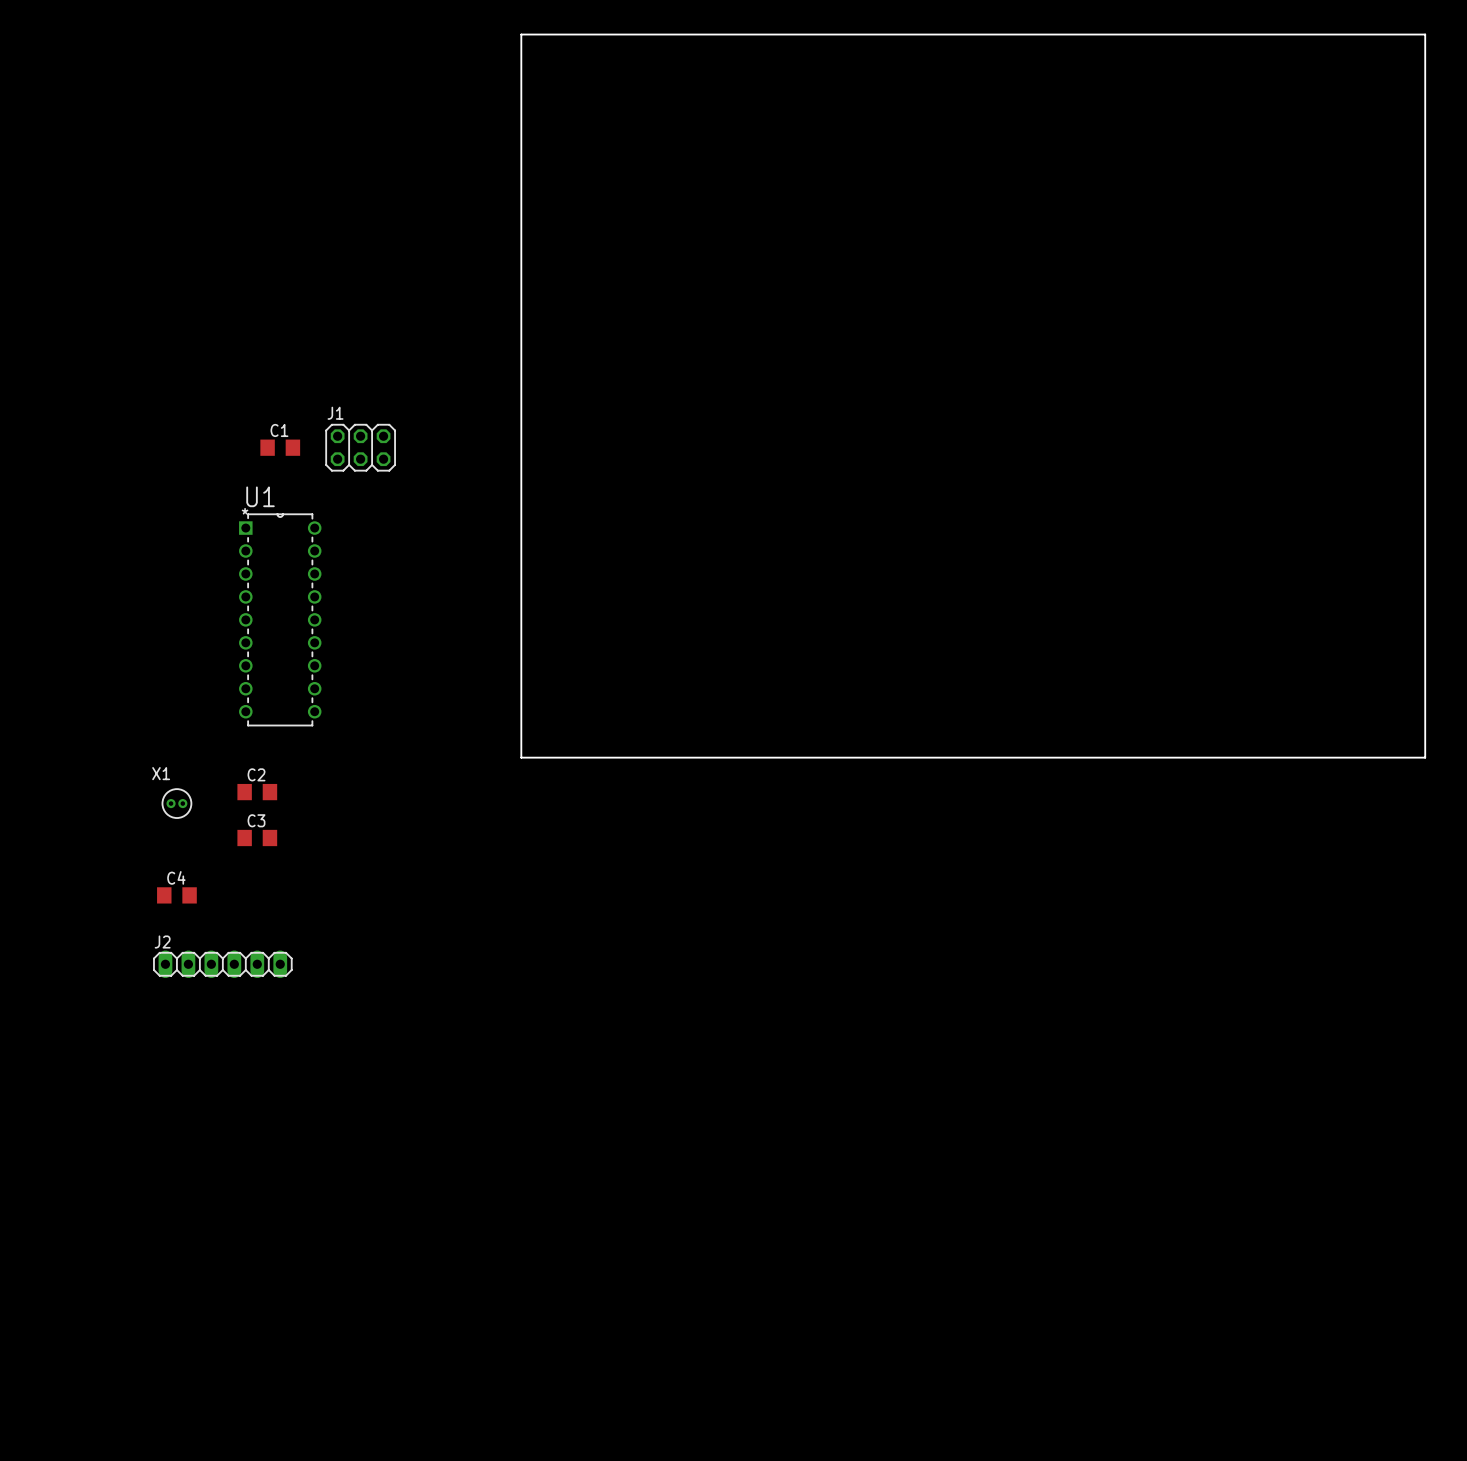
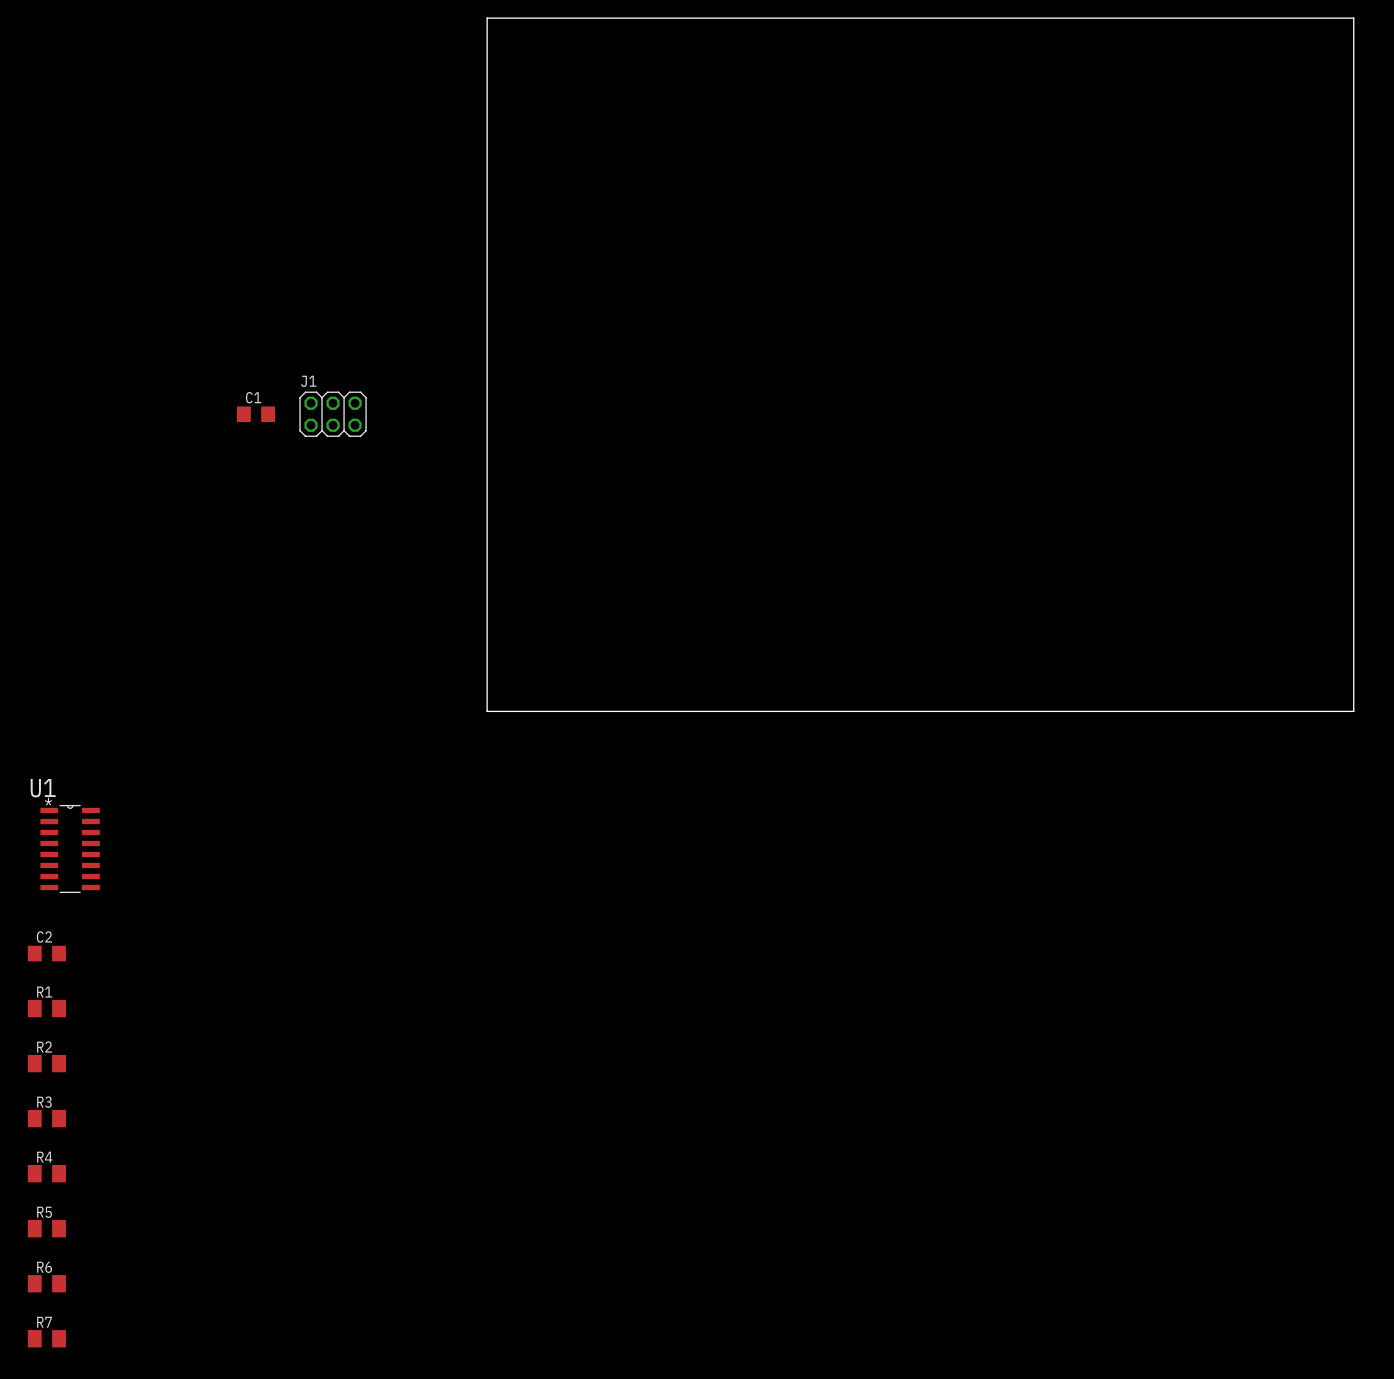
U1 name position: U1 (260, 496) -> U1 (43, 788)
U1 footprint: [239, 513, 322, 727] -> [40, 804, 100, 894]
C2 position: (257, 792) -> (46, 953)
X1: (176, 803) -> none
C3: (257, 838) -> none
C4: (176, 895) -> none
J2: (222, 964) -> none
R1: none -> (46, 1008)
R2: none -> (46, 1063)
R3: none -> (46, 1118)
R4: none -> (46, 1173)
R5: none -> (46, 1228)
R6: none -> (46, 1283)
R7: none -> (46, 1338)

